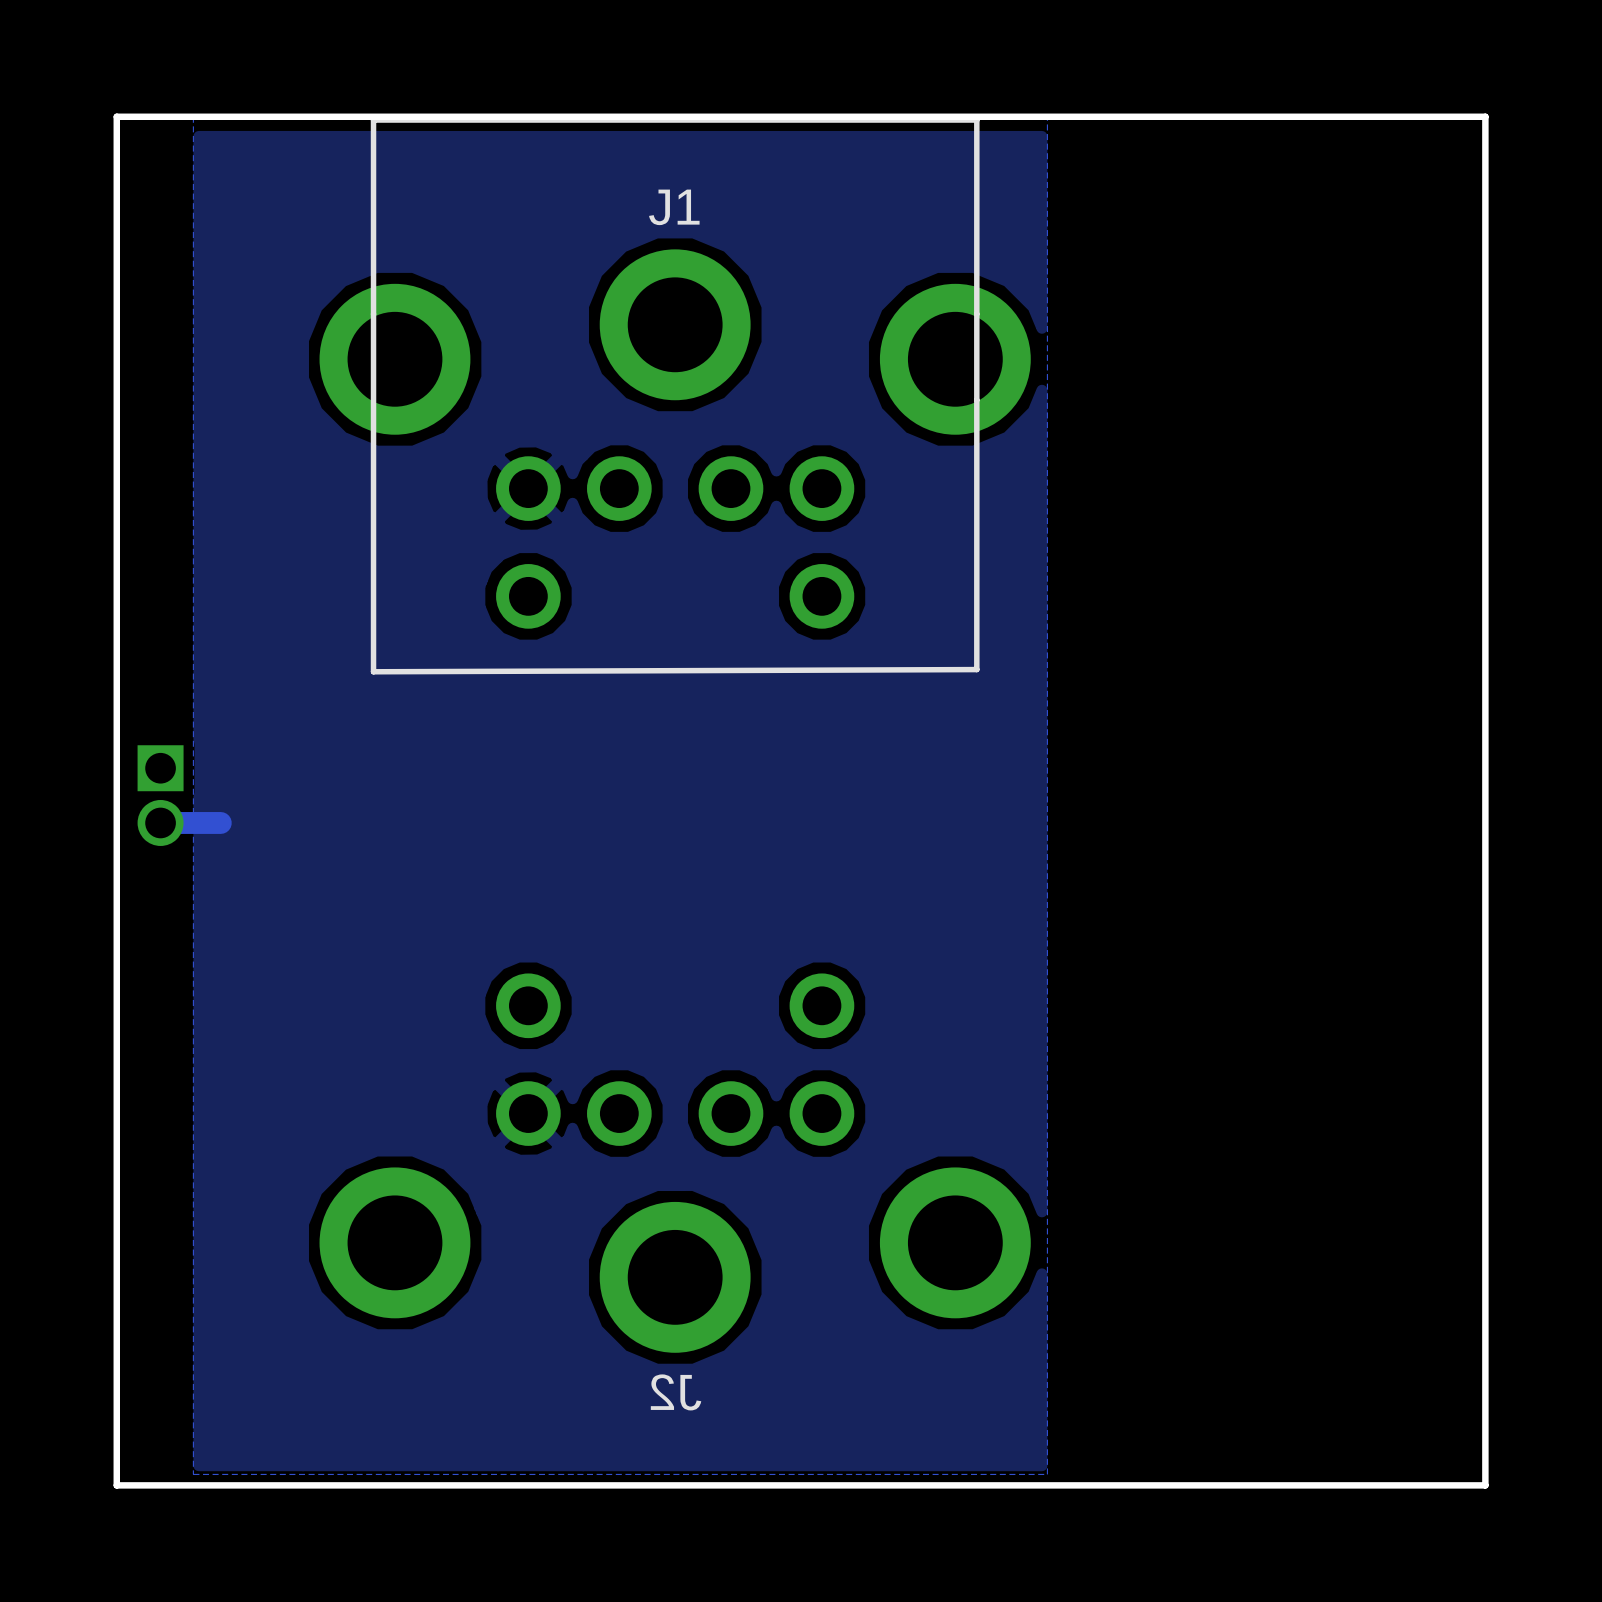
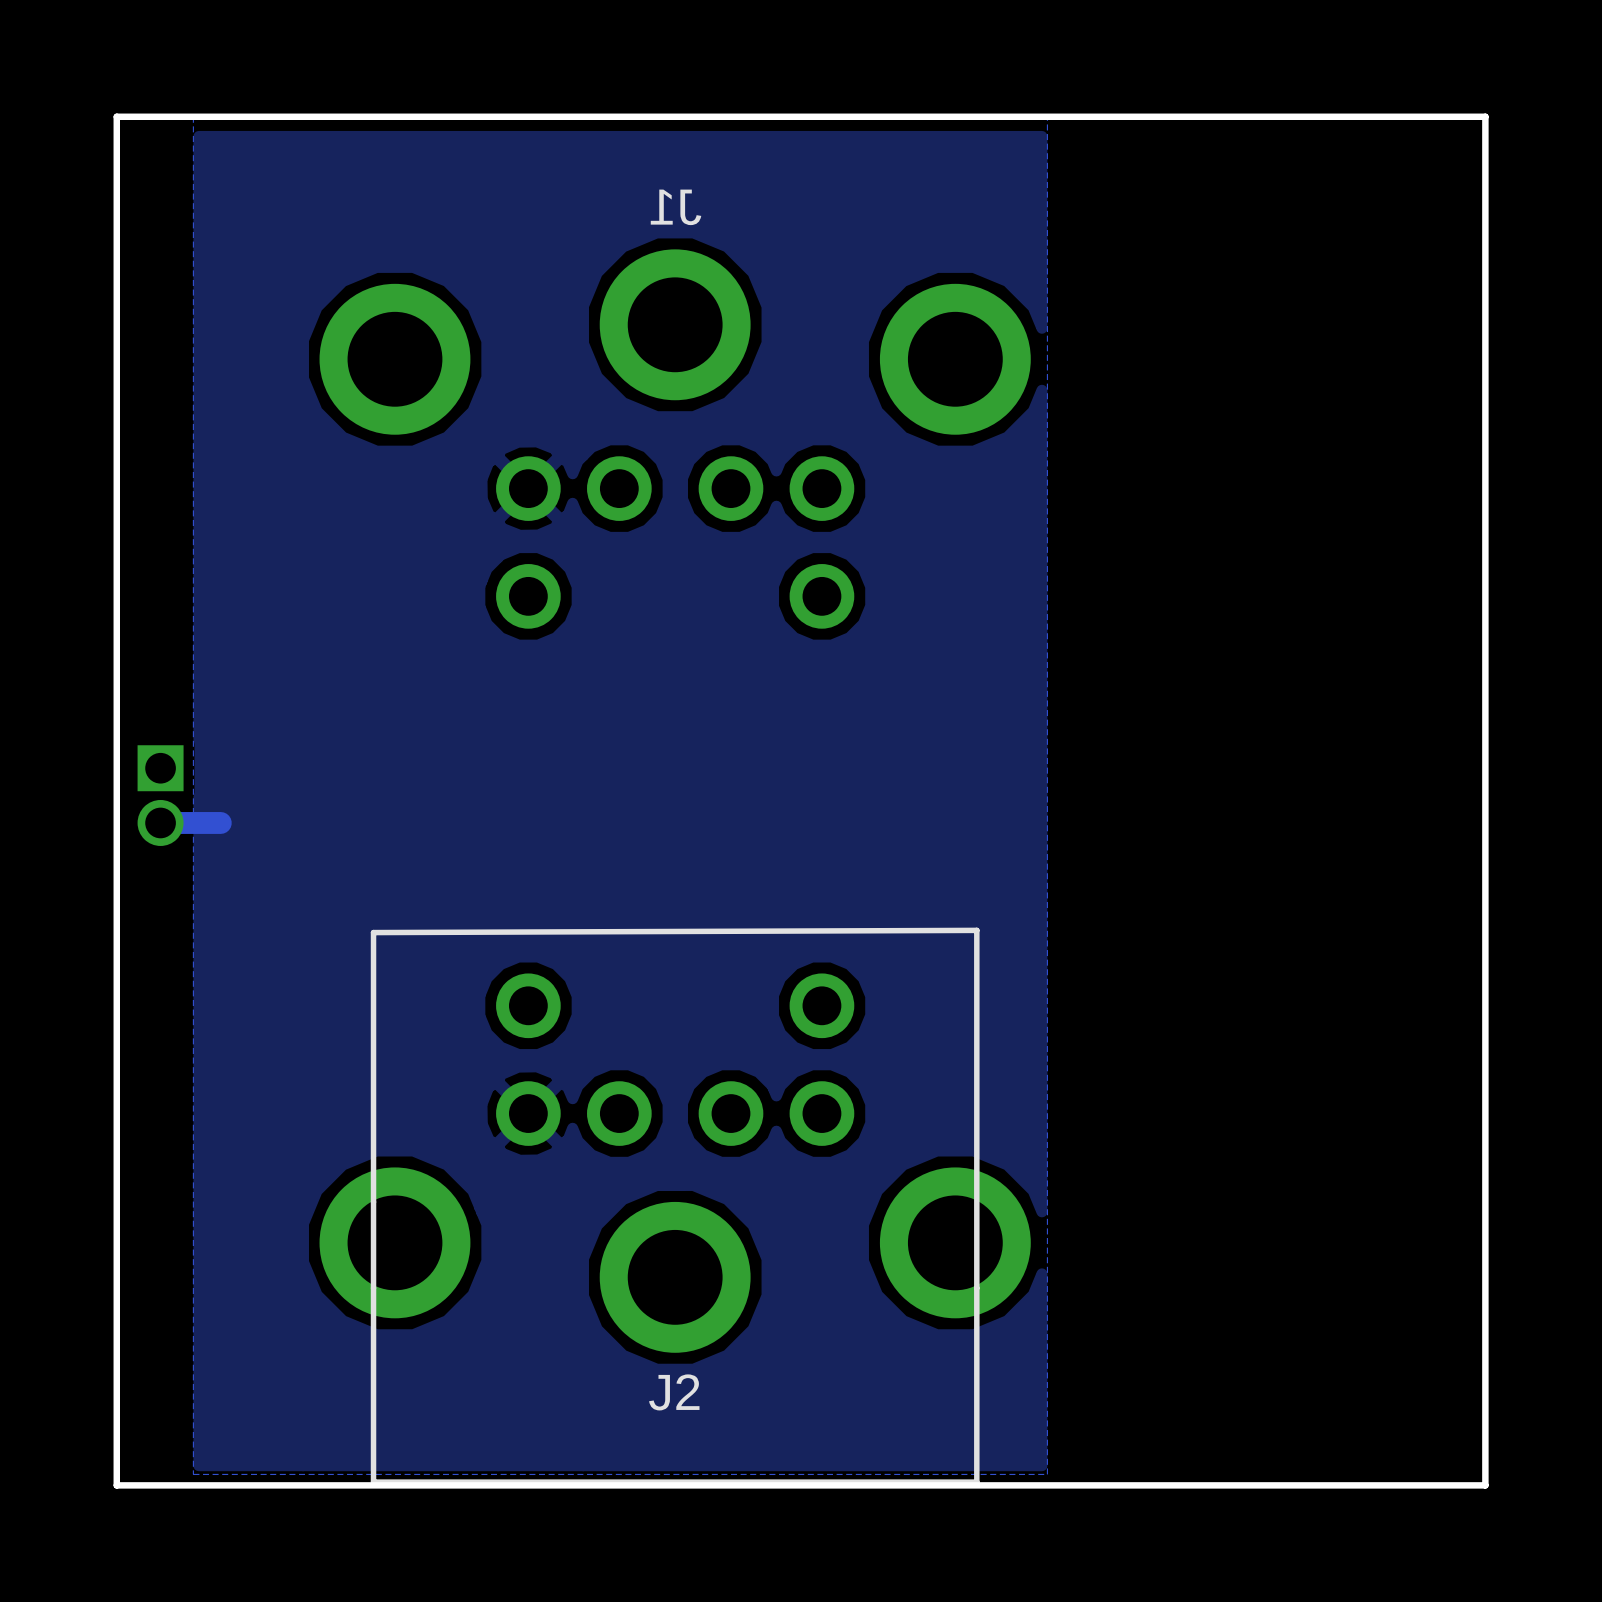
J1 side: bottom (675, 395) -> top (675, 439)
J2 side: top (675, 1163) -> bottom (675, 1206)

